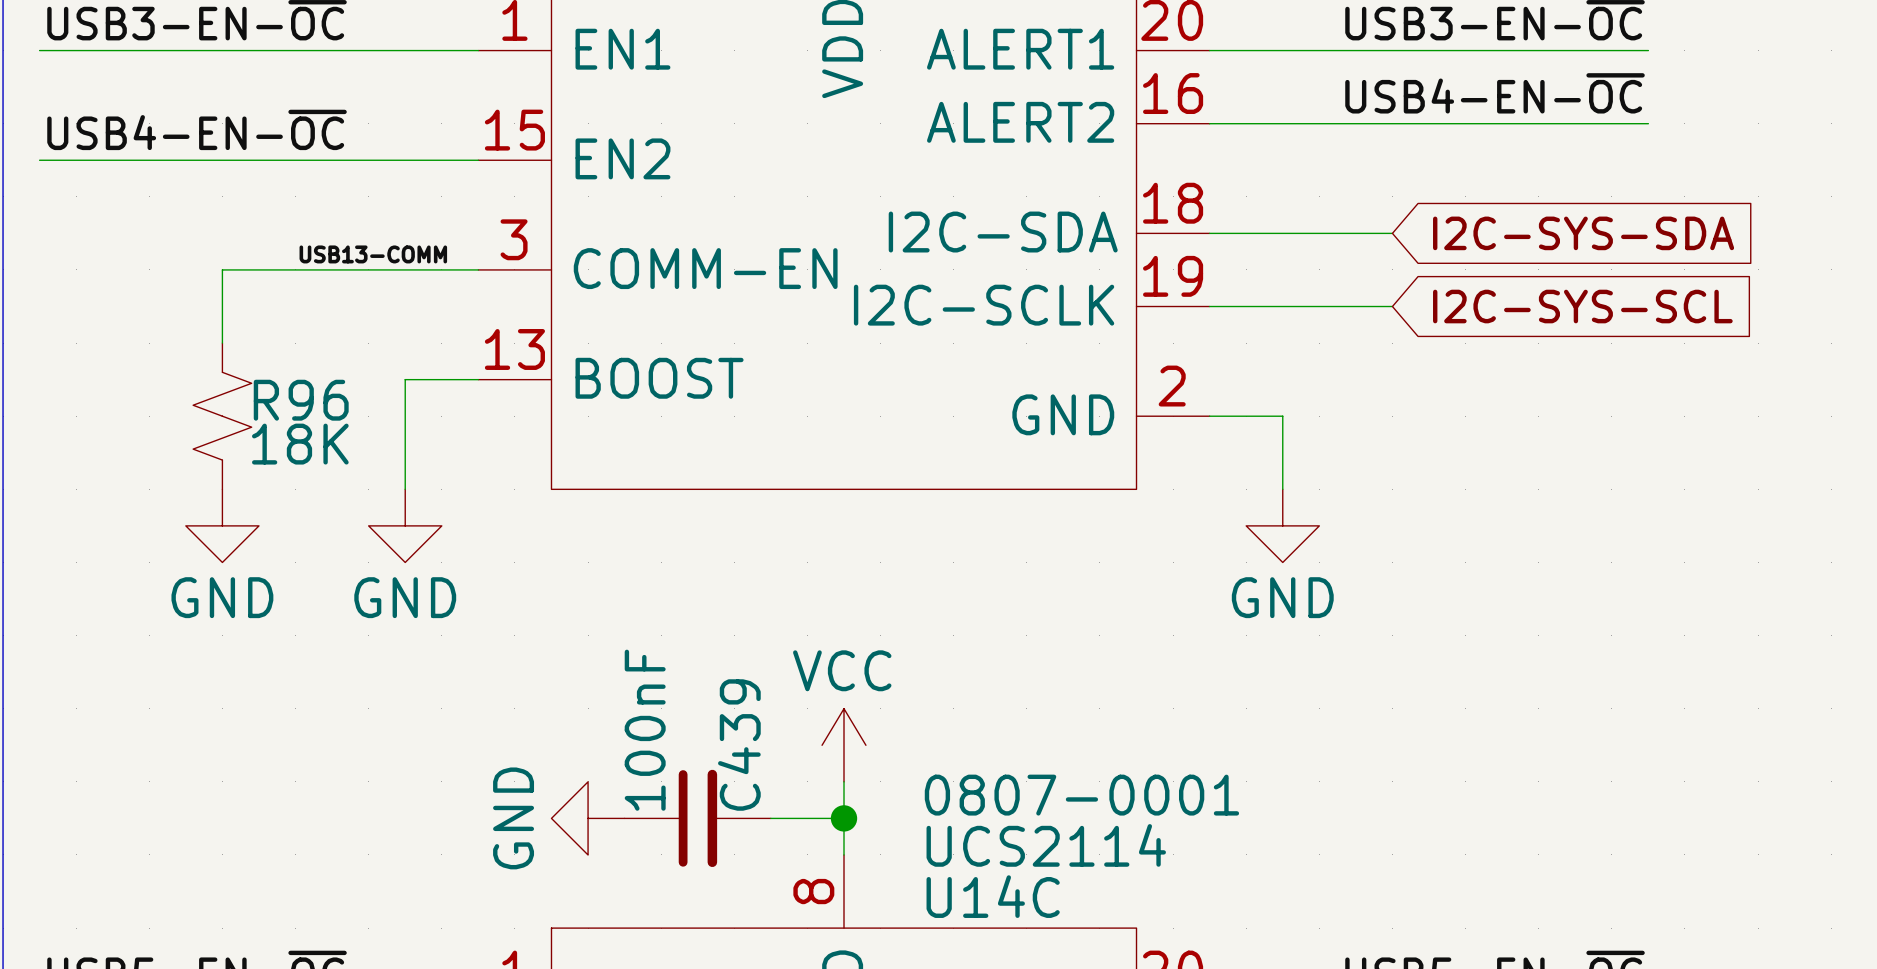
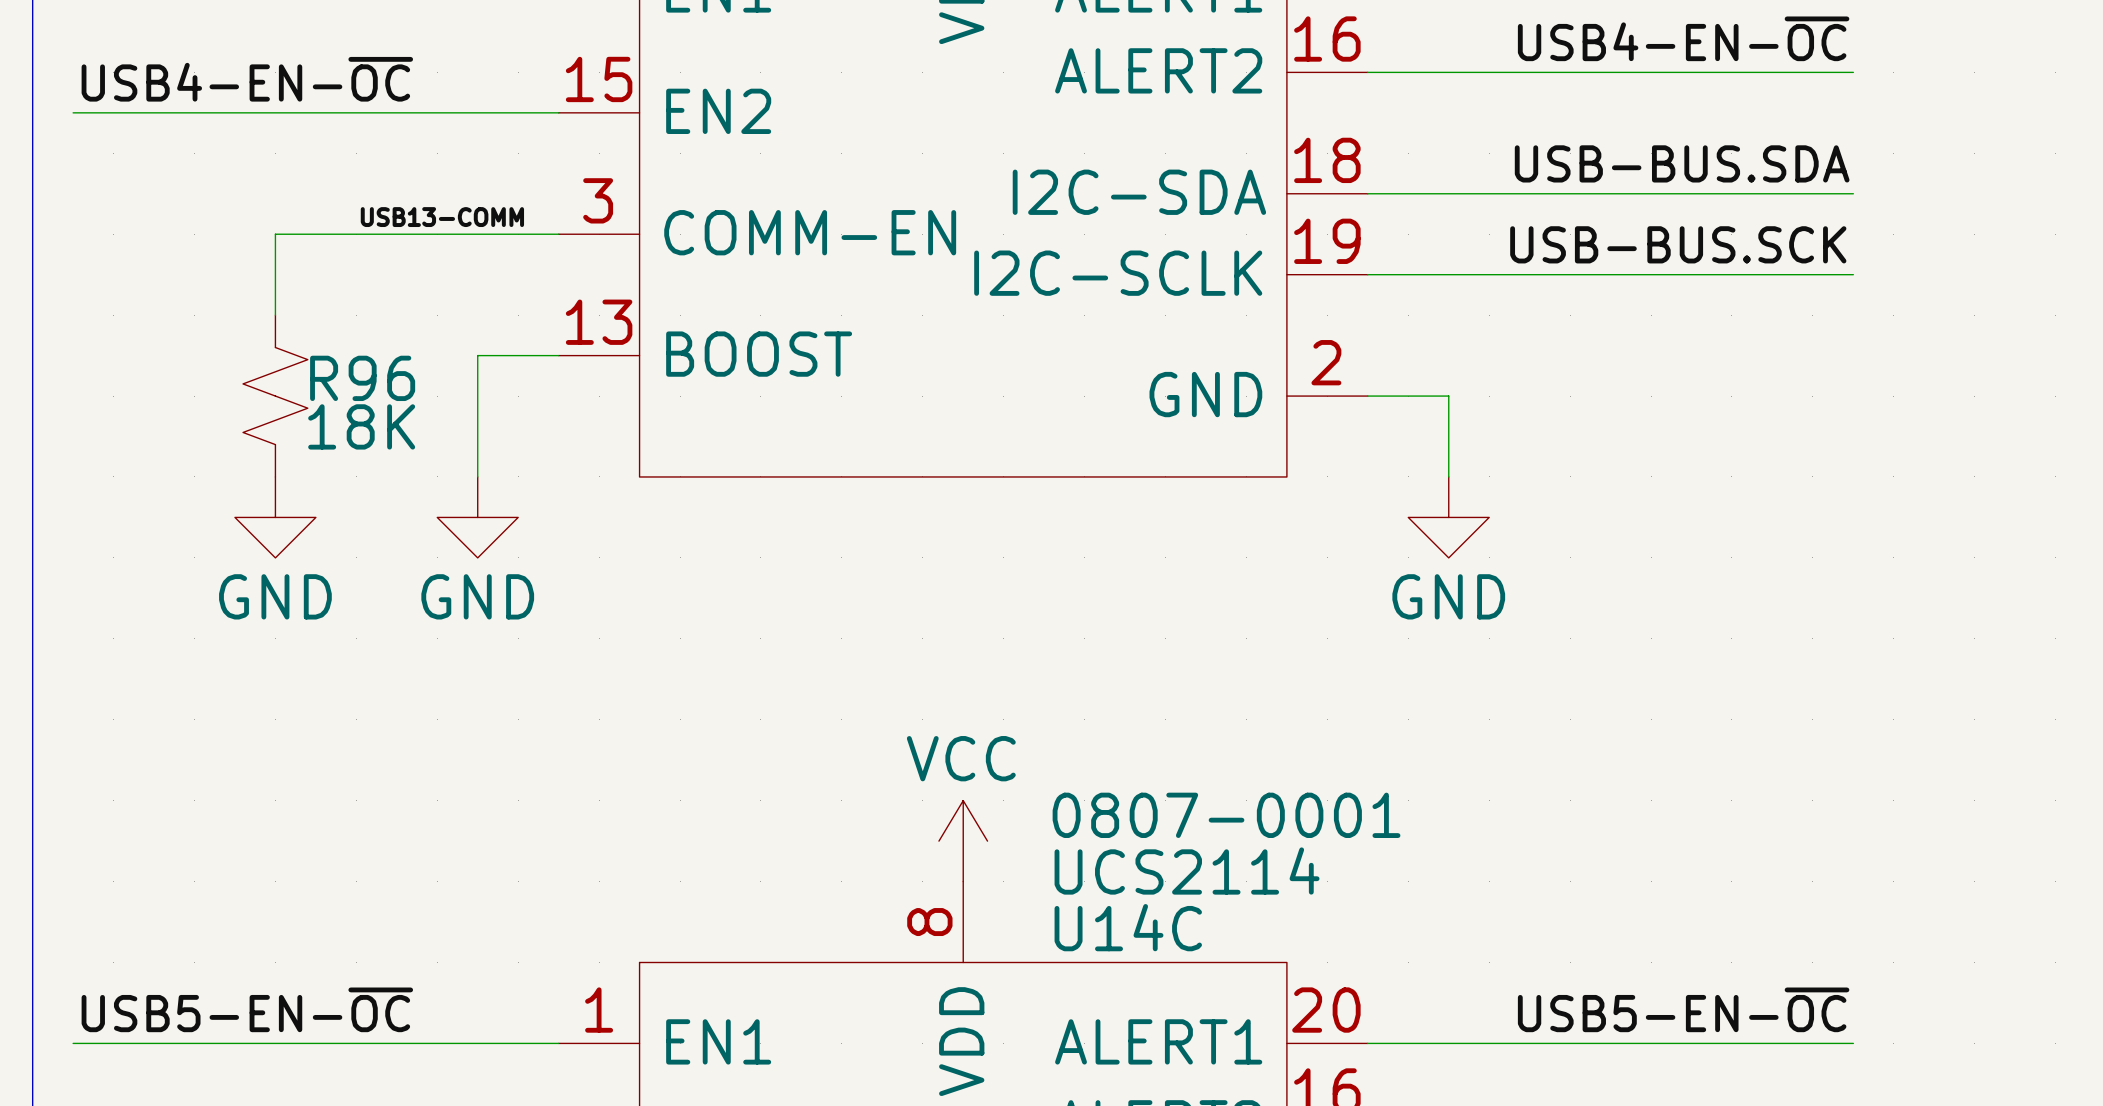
label: none -> USB-BUS.SDA (1682, 163)
wire: none -> (1570, 193) (1853, 193)
global label: I2C-SYS-SDA (1583, 233) -> none
label: none -> USB-BUS.SCK (1678, 244)
wire: none -> (1570, 274) (1853, 274)
global label: I2C-SYS-SCL (1582, 306) -> none
power symbol position: VCC (843, 745) -> VCC (963, 841)
power symbol: GND (588, 818) -> none
C439: 100nF (697, 818) -> none
wire: (770, 818) (843, 818) -> none
junction: (843, 818) -> none

